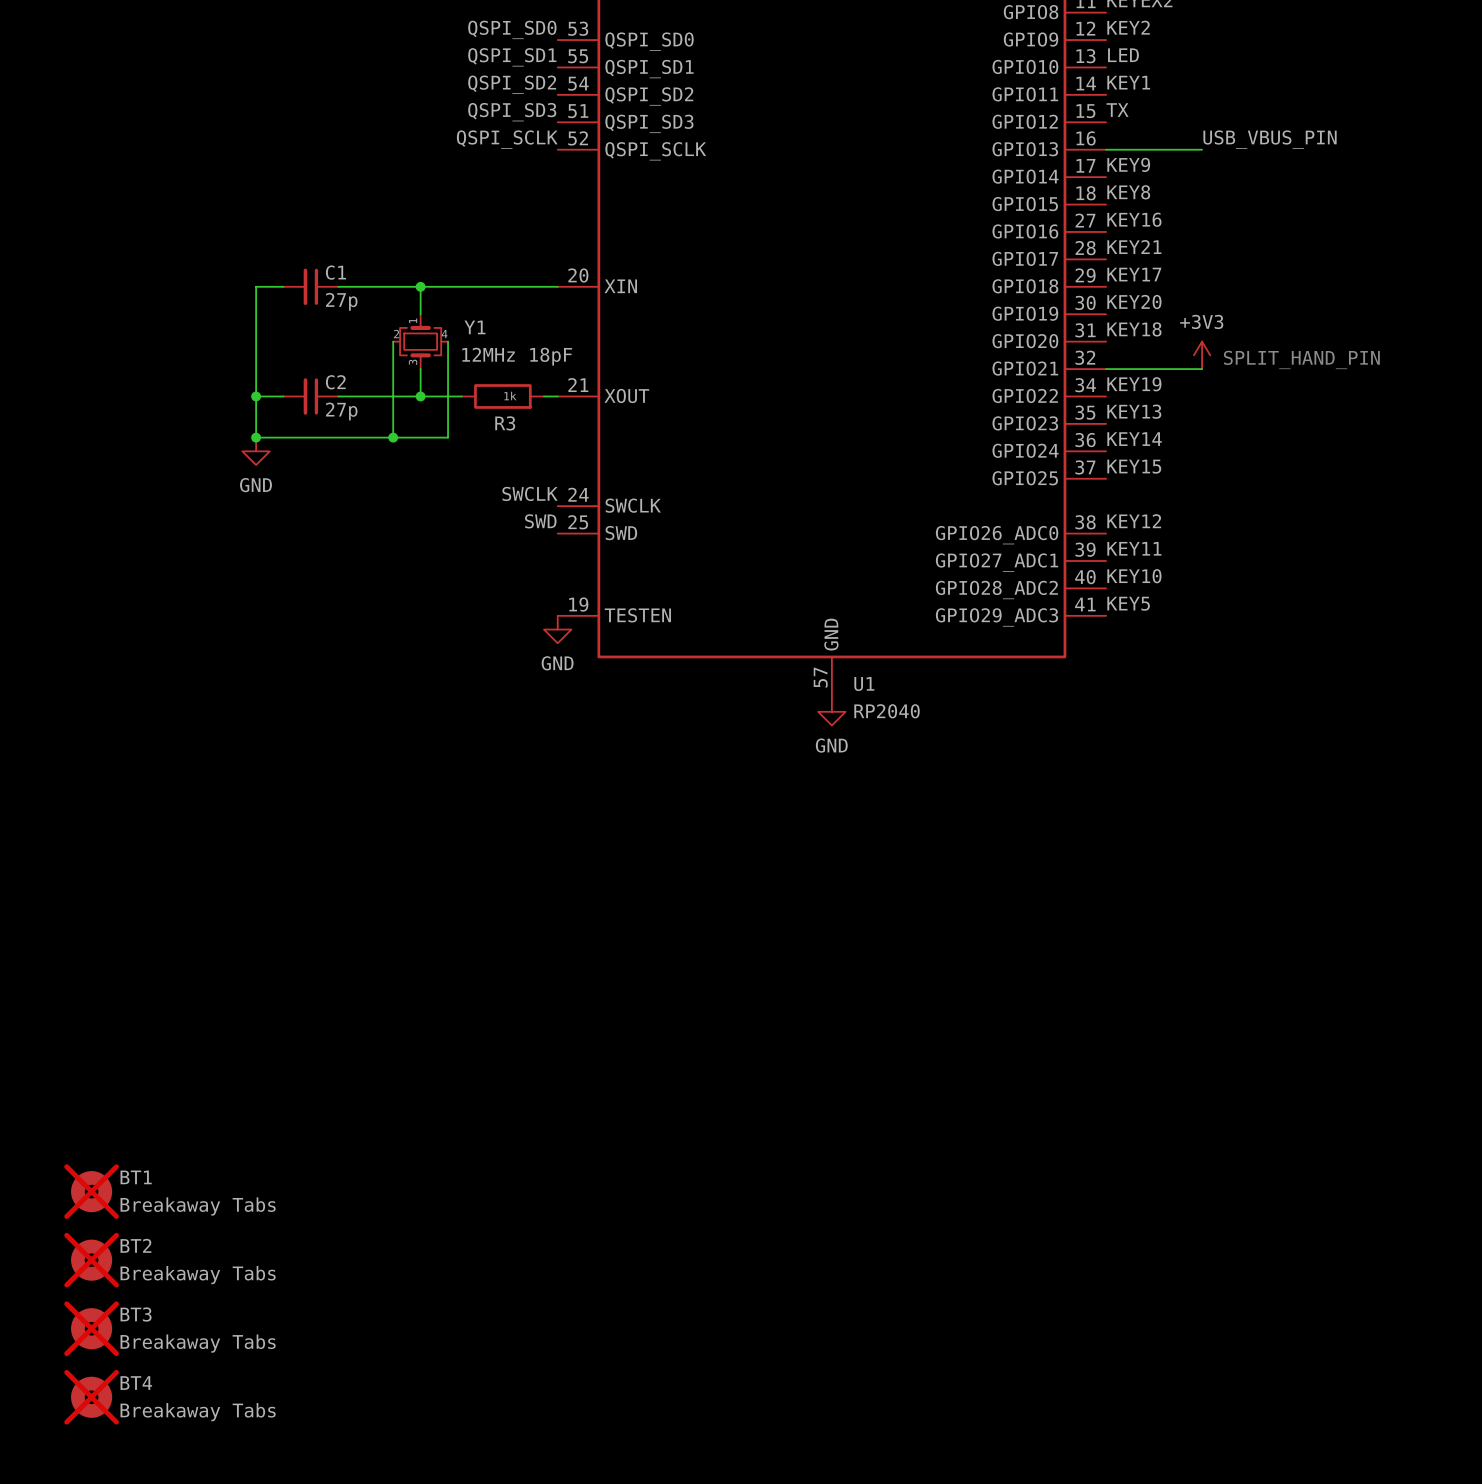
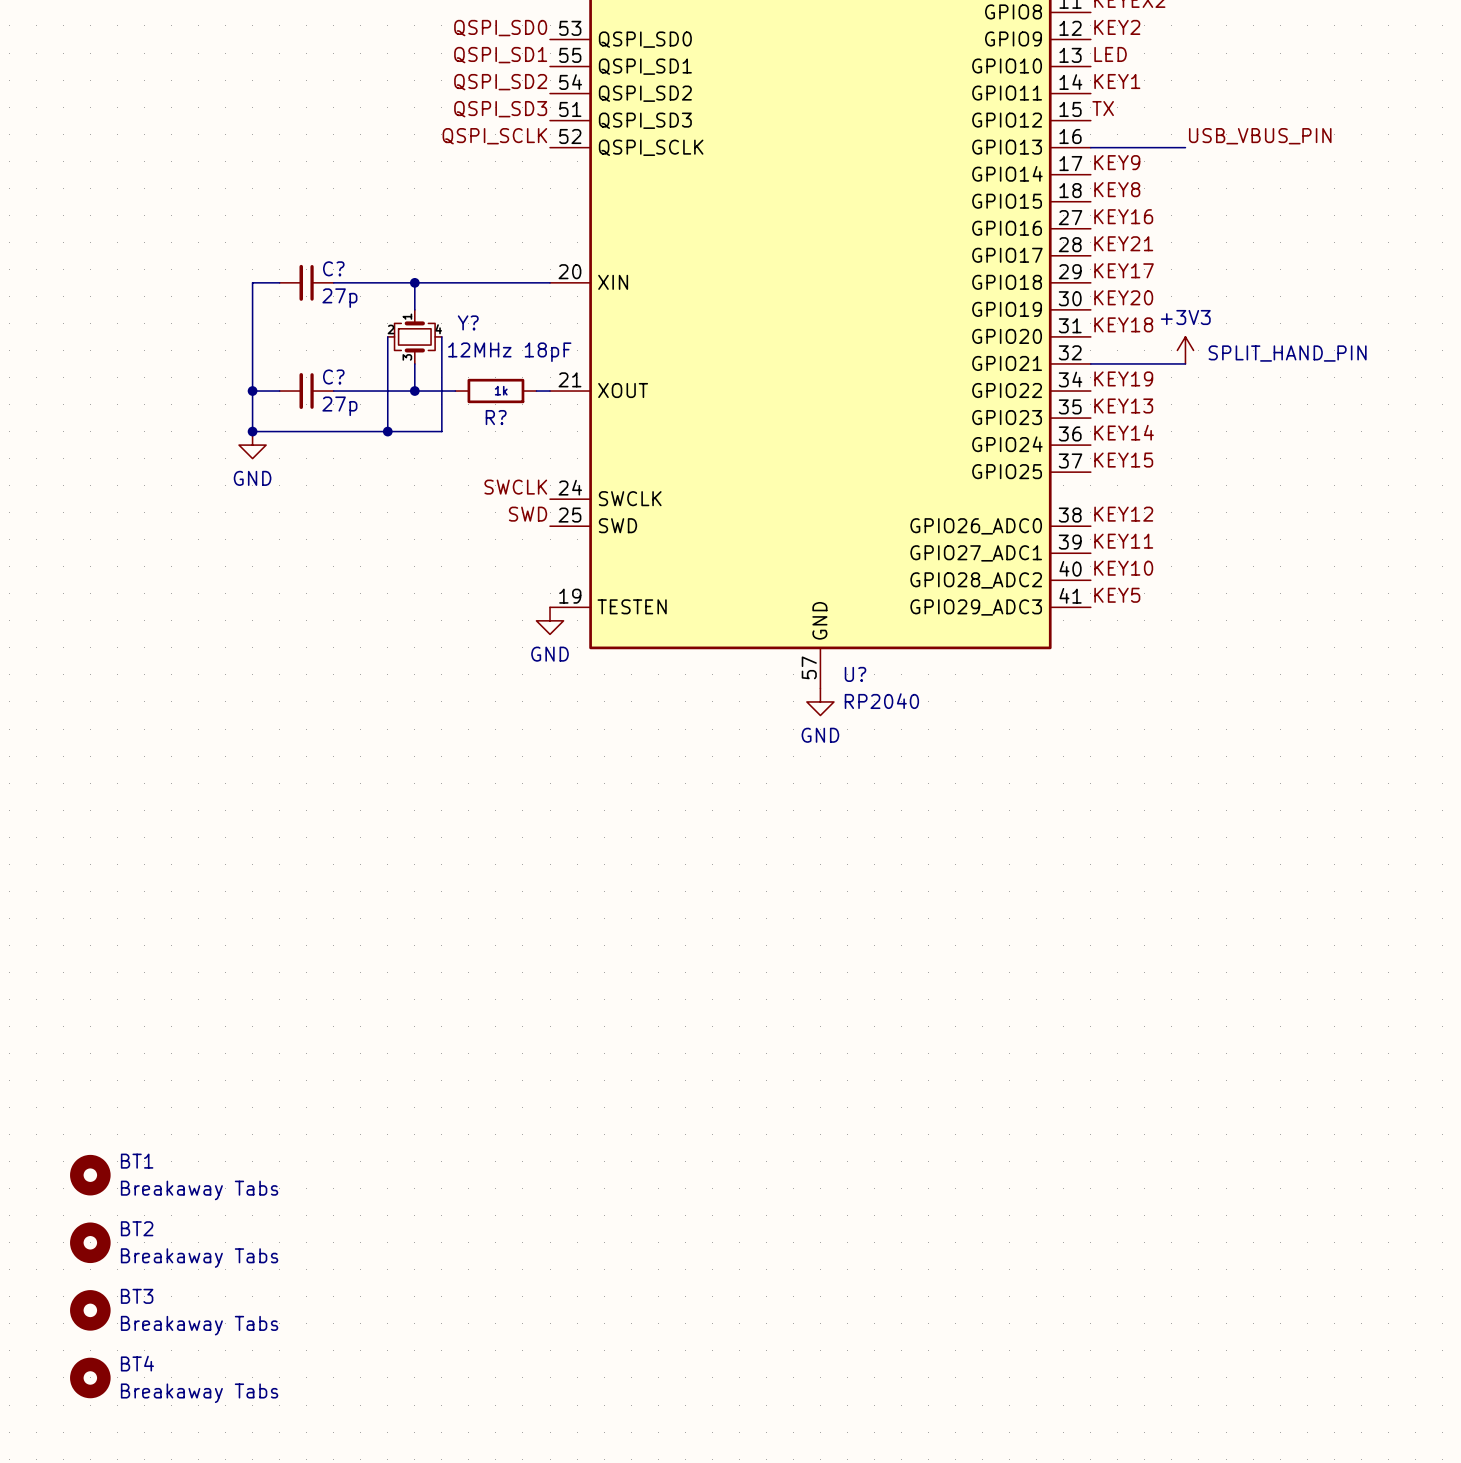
C1 name: C1 (335, 272) -> C? (333, 268)
Y1 name: Y1 (474, 327) -> Y? (468, 322)
C2 name: C2 (335, 382) -> C? (333, 376)
R3 name: R3 (505, 423) -> R? (496, 417)
U1 name: U1 (864, 684) -> U? (855, 674)
BT1 do-not-place cross: (91, 1191) -> none
BT2 do-not-place cross: (91, 1260) -> none
BT3 do-not-place cross: (91, 1328) -> none
BT4 do-not-place cross: (91, 1397) -> none

